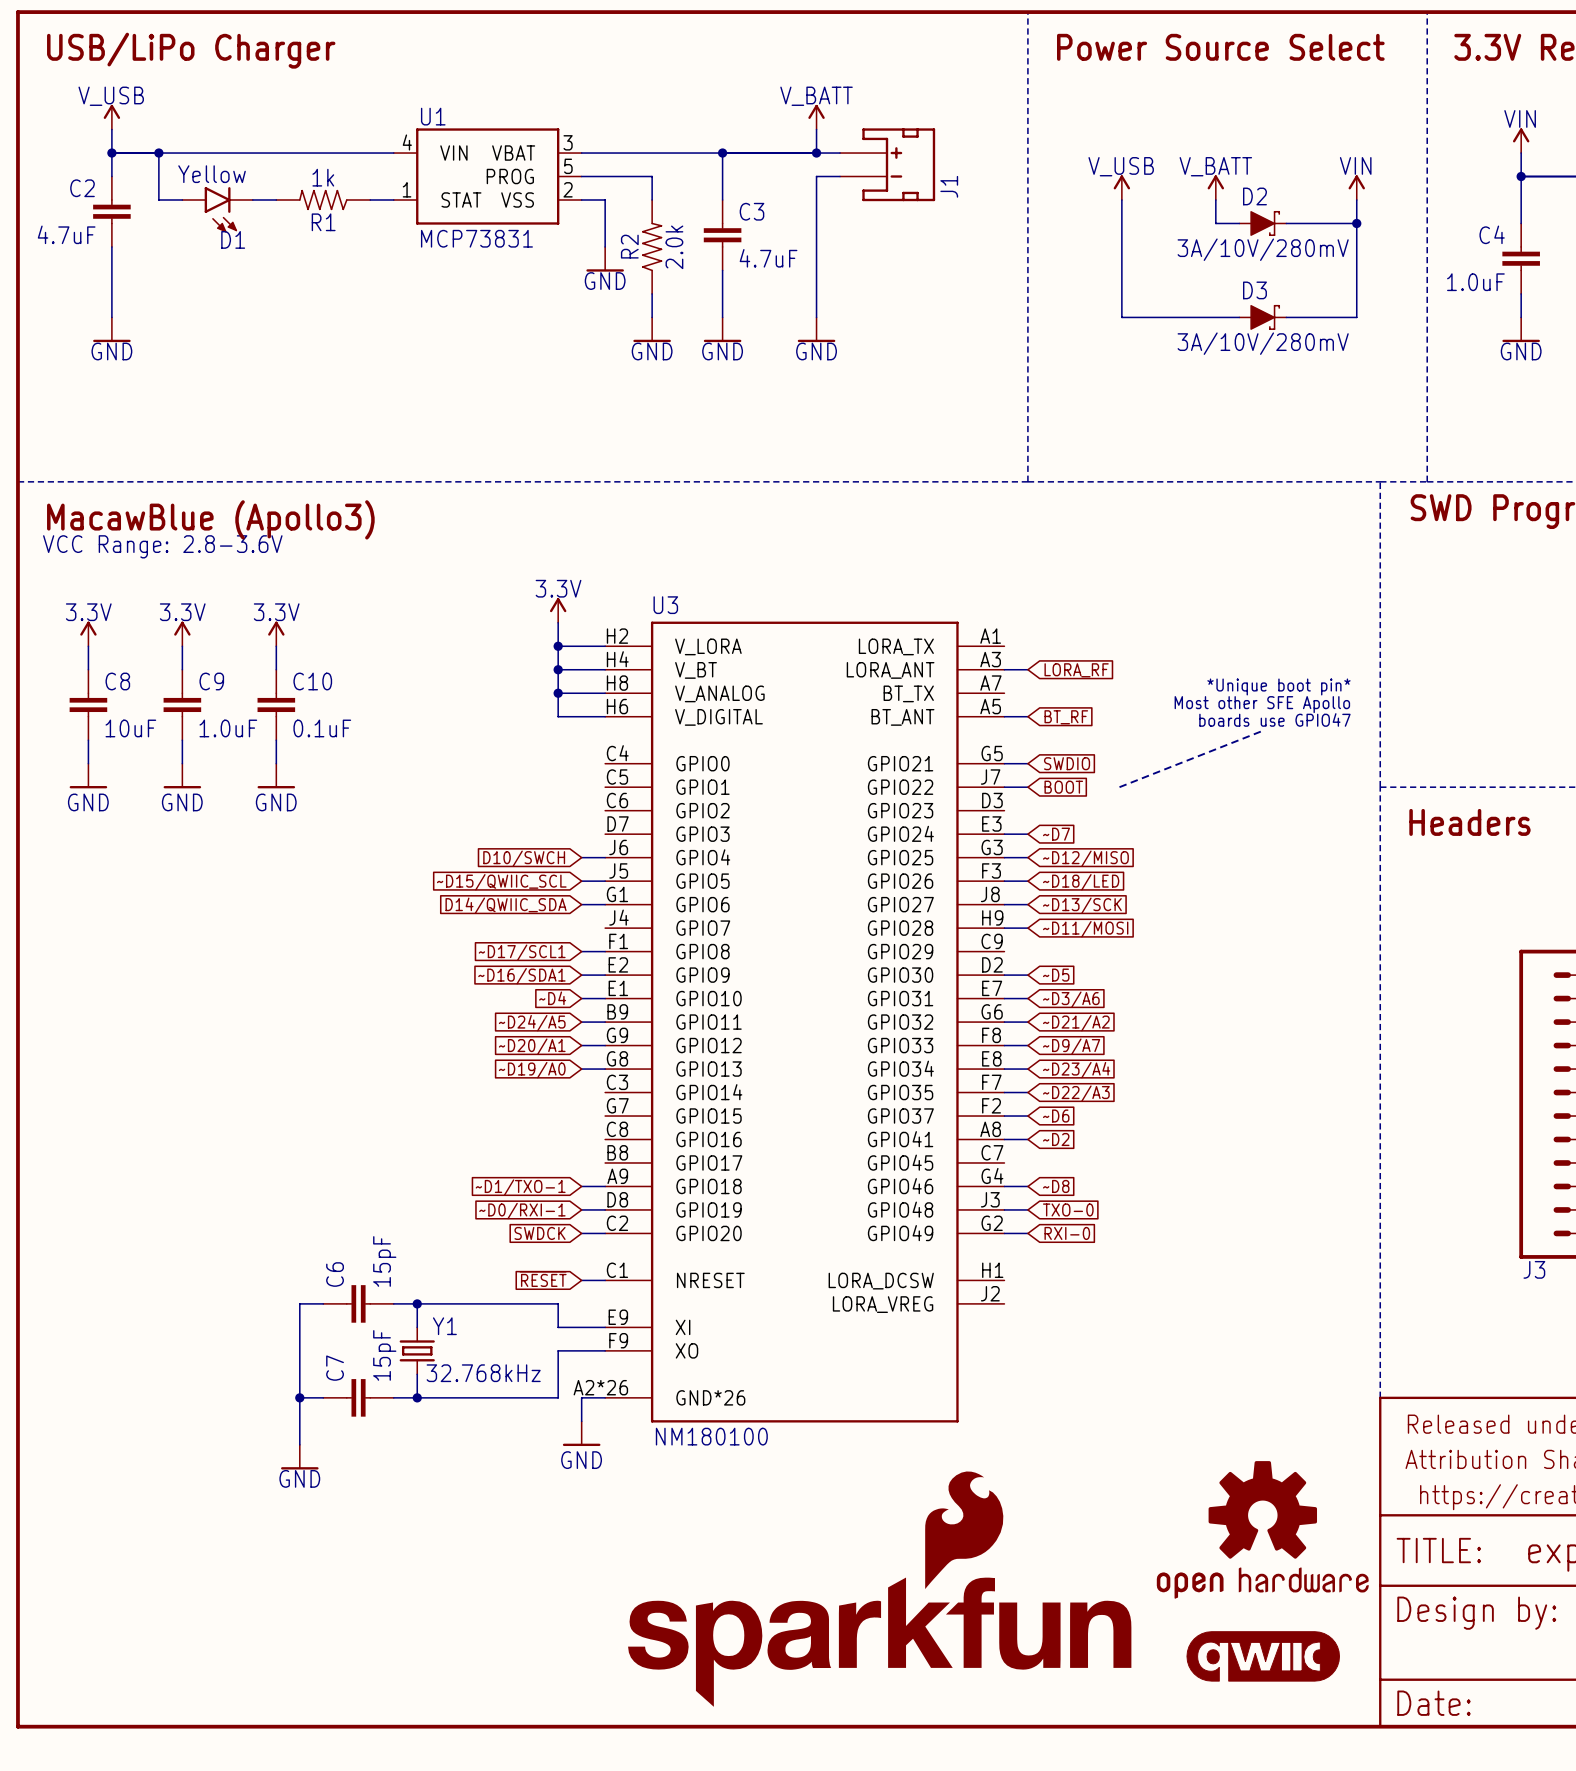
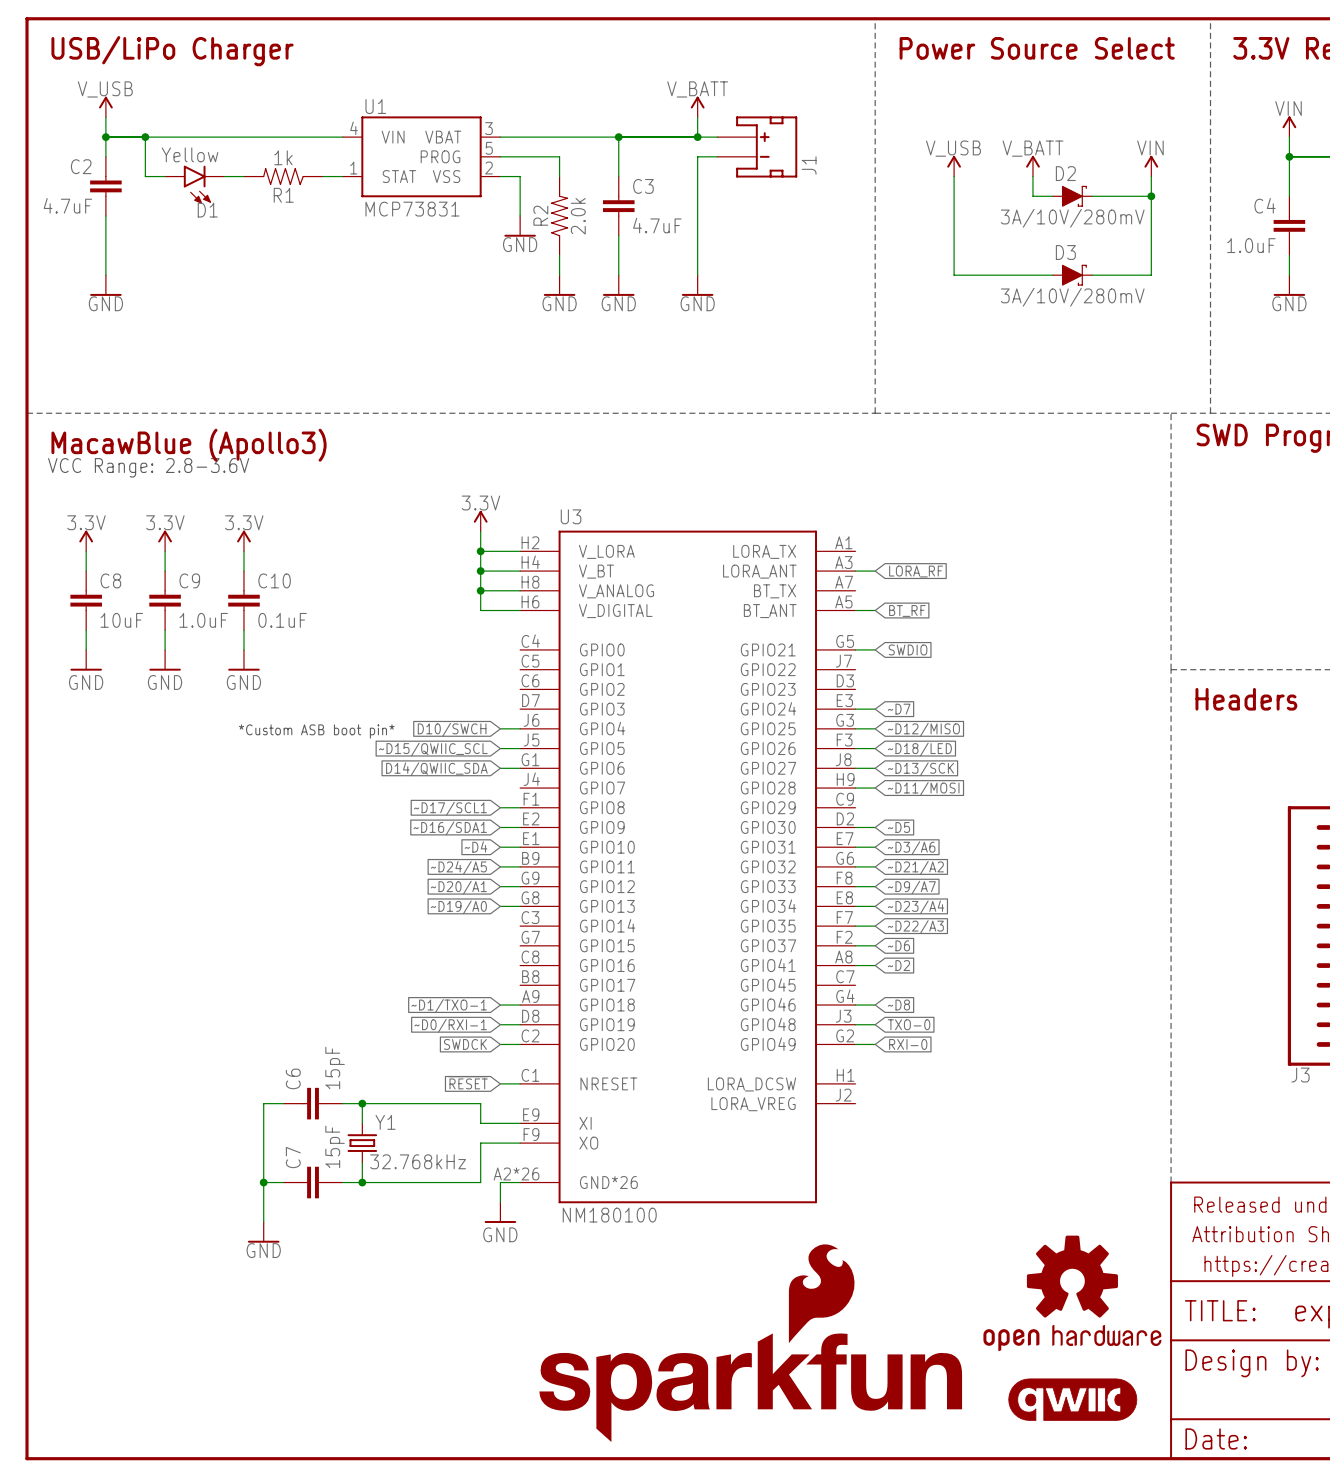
text: *Unique boot pin* (1278, 686) -> none
text: Most other SFE Apollo (1262, 704) -> none
text: boards use GPIO47 (1274, 719) -> none
line: (1262, 730) (1119, 787) -> none
wire: (1004, 787) (1027, 787) -> none
global label: BOOT (1063, 787) -> none
text: none -> *Custom ASB boot pin* (316, 731)

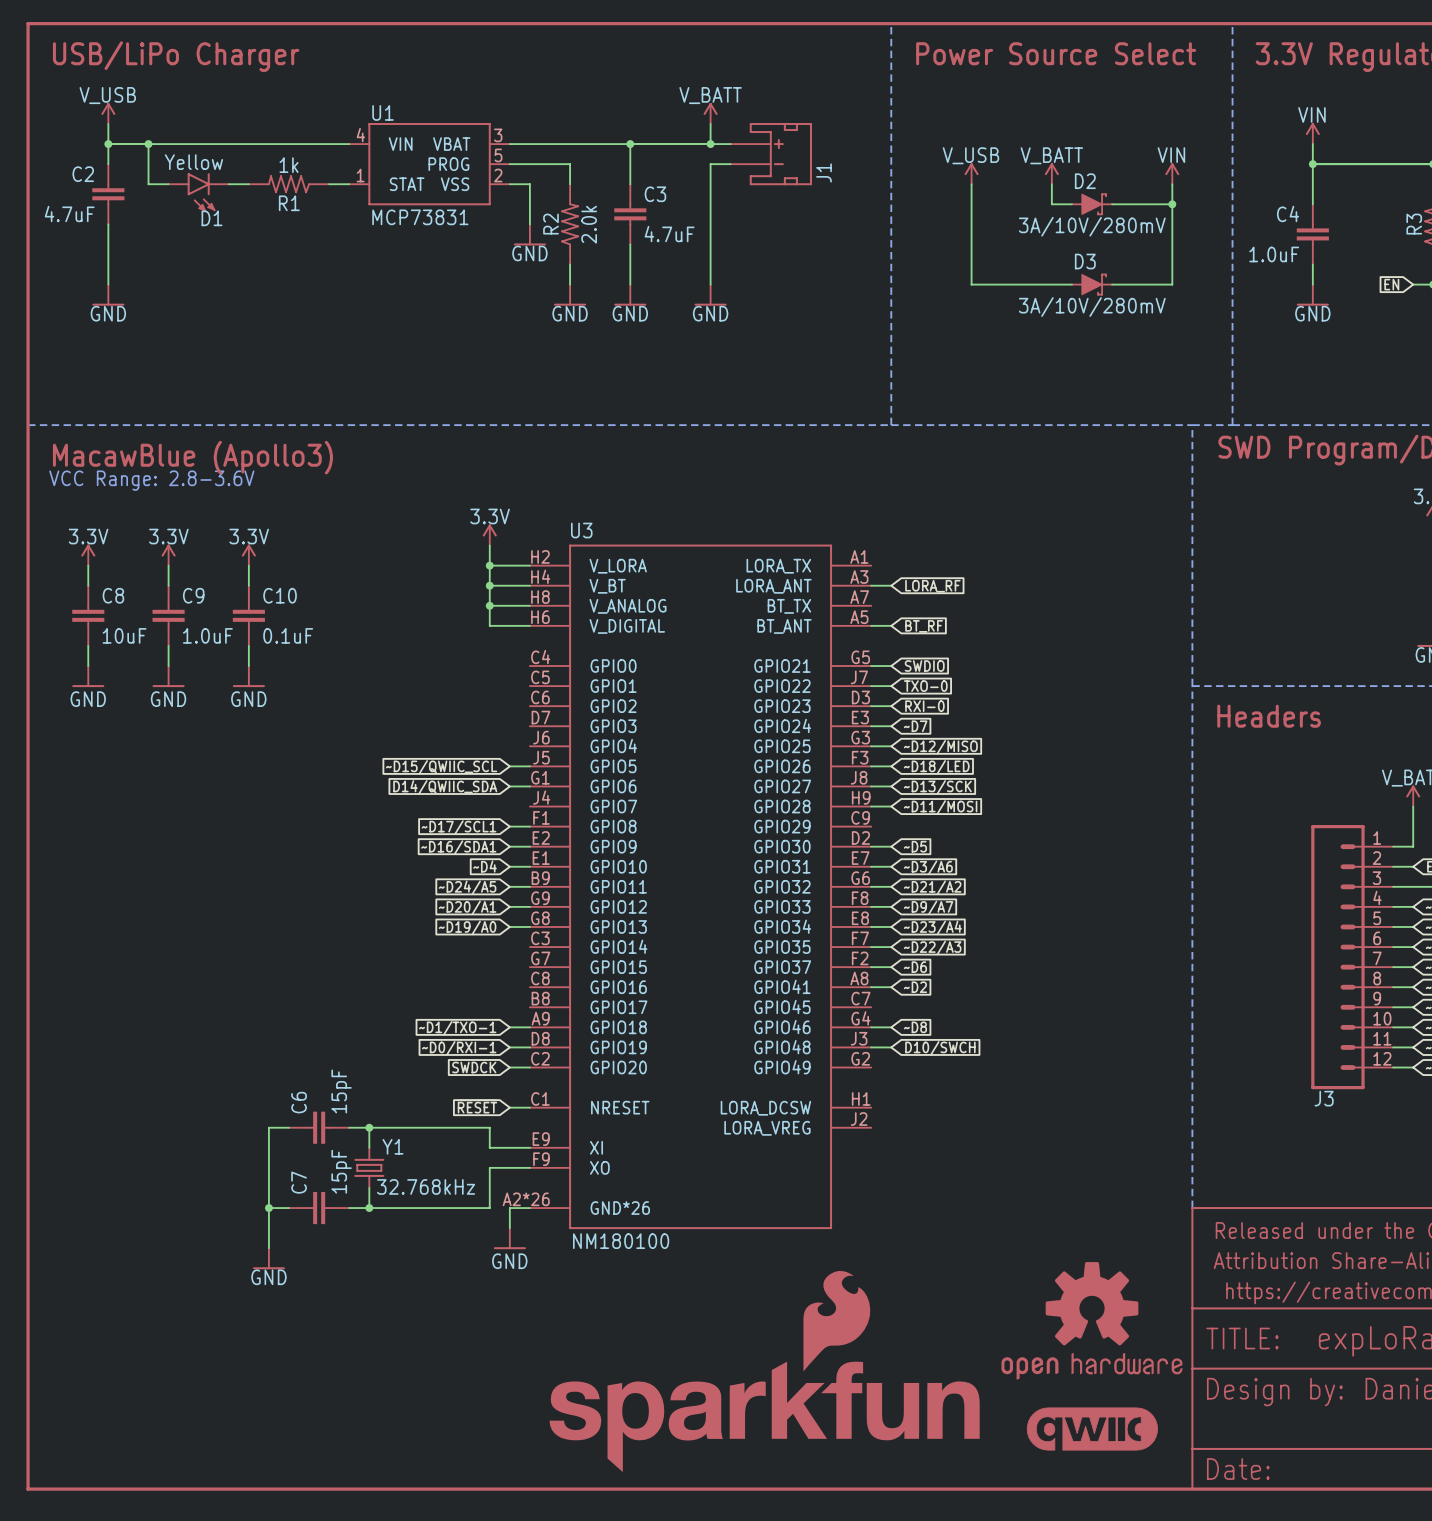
wire: none -> (871, 686) (891, 686)
global label: none -> TXO-0 (925, 686)
wire: none -> (871, 706) (891, 706)
global label: none -> RXI-0 (924, 706)
wire: (500, 728) (520, 728) -> none
global label: D10/SWCH (452, 729) -> none
text: *Custom ASB boot pin* (316, 731) -> none
global label: TXO-0 (909, 1024) -> D10/SWCH (940, 1048)
wire: (855, 1044) (875, 1044) -> none
global label: RXI-0 (908, 1044) -> none

